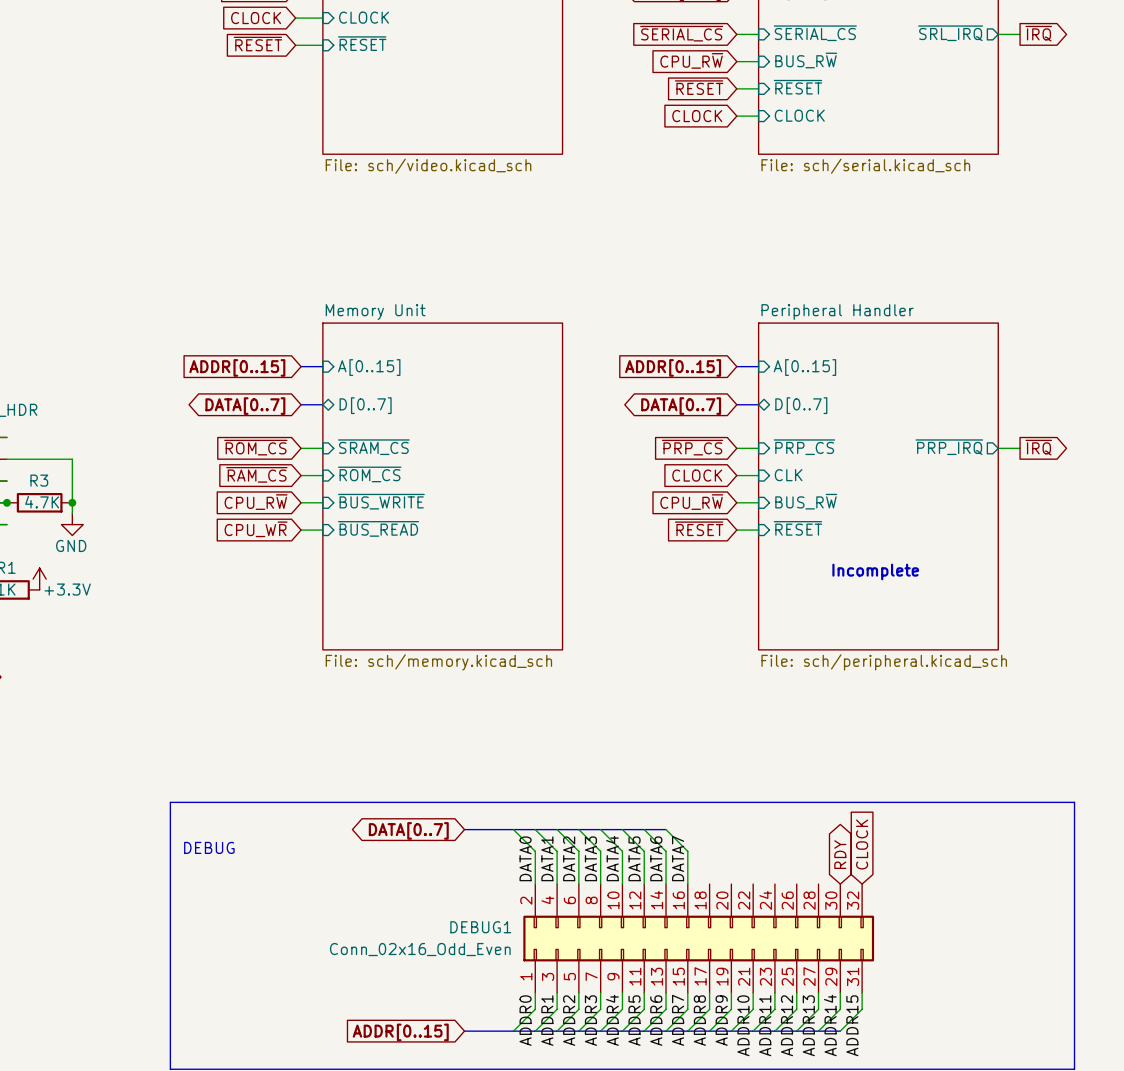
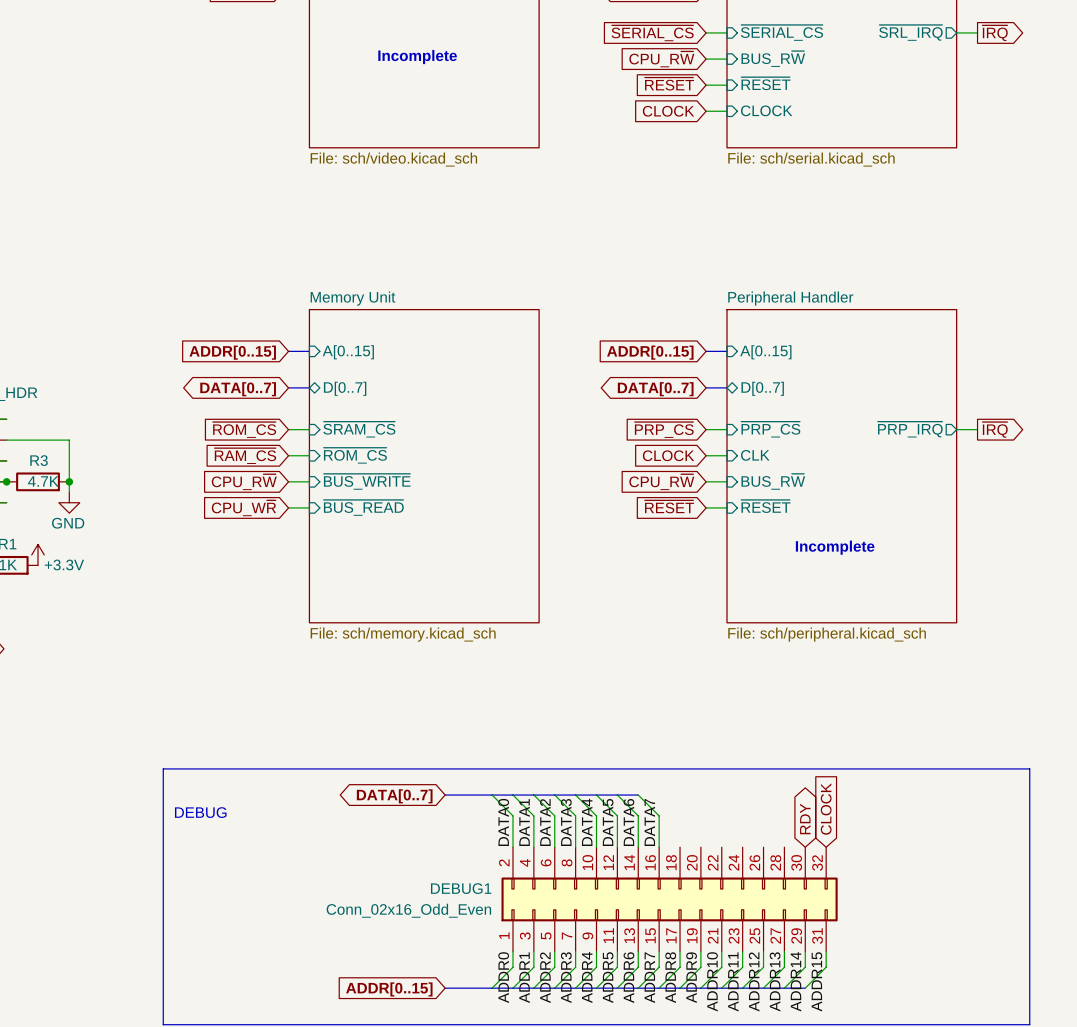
sheet pin: CLOCK (364, 17) -> none
global label: CLOCK (256, 18) -> none
wire: (295, 18) (322, 18) -> none
sheet pin: ~{RESET} (362, 43) -> none
global label: ~{RESET} (257, 44) -> none
wire: (295, 45) (322, 45) -> none
text: none -> Incomplete (417, 57)

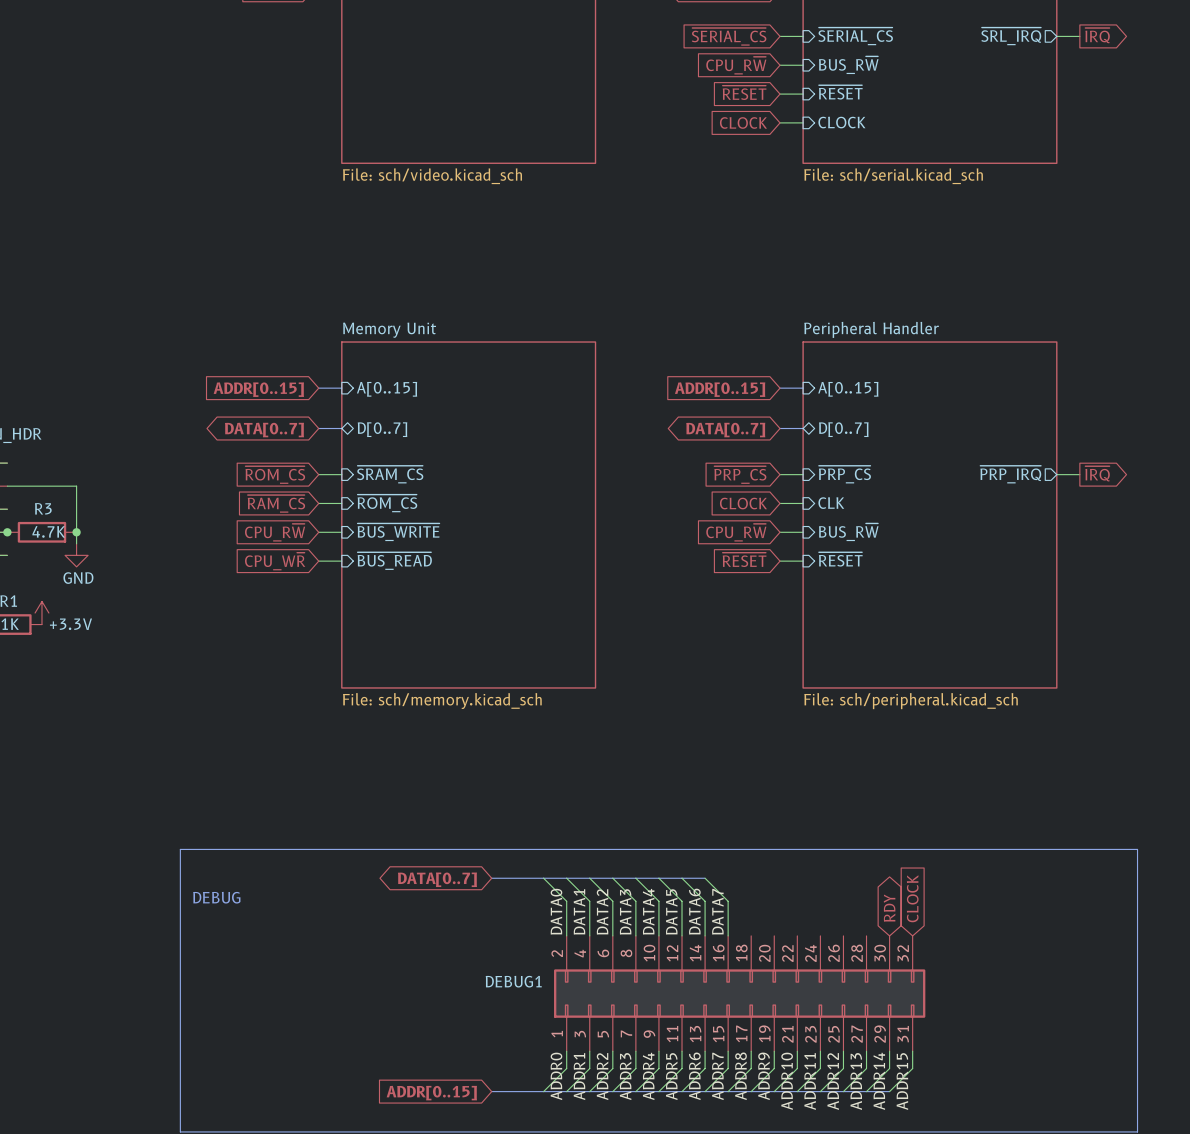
text: Incomplete (417, 57) -> none
text: Incomplete (835, 547) -> none
DEBUG1 value: Conn_02x16_Odd_Even (408, 910) -> none

